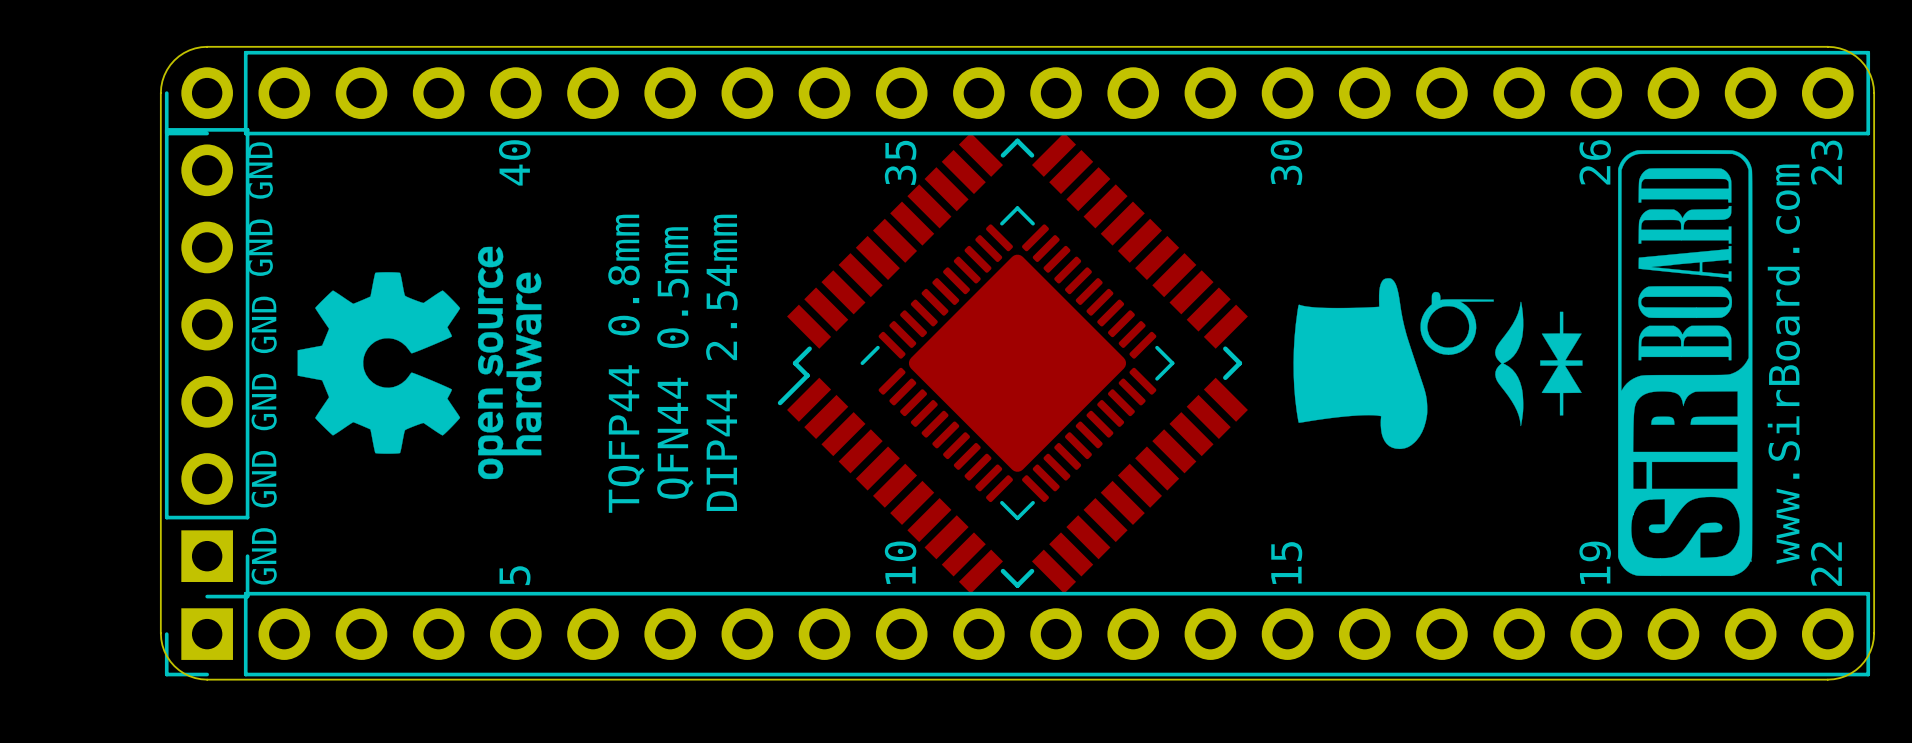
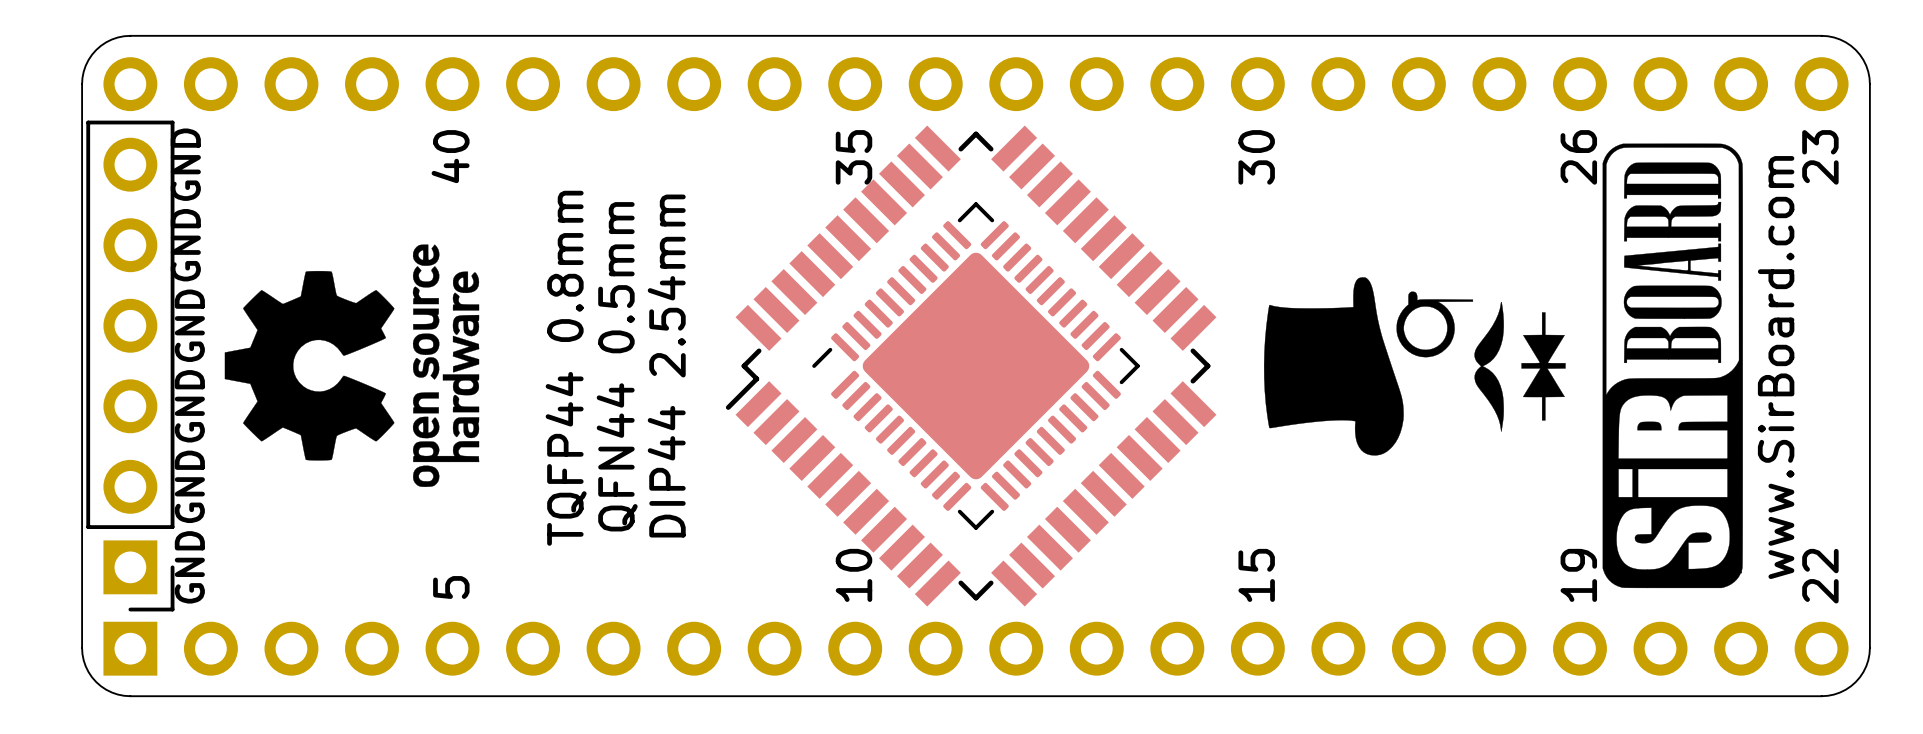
part footprint: [164, 50, 1871, 136] -> [103, 57, 1849, 112]
part footprint: [164, 591, 1871, 677] -> [103, 621, 1849, 676]

